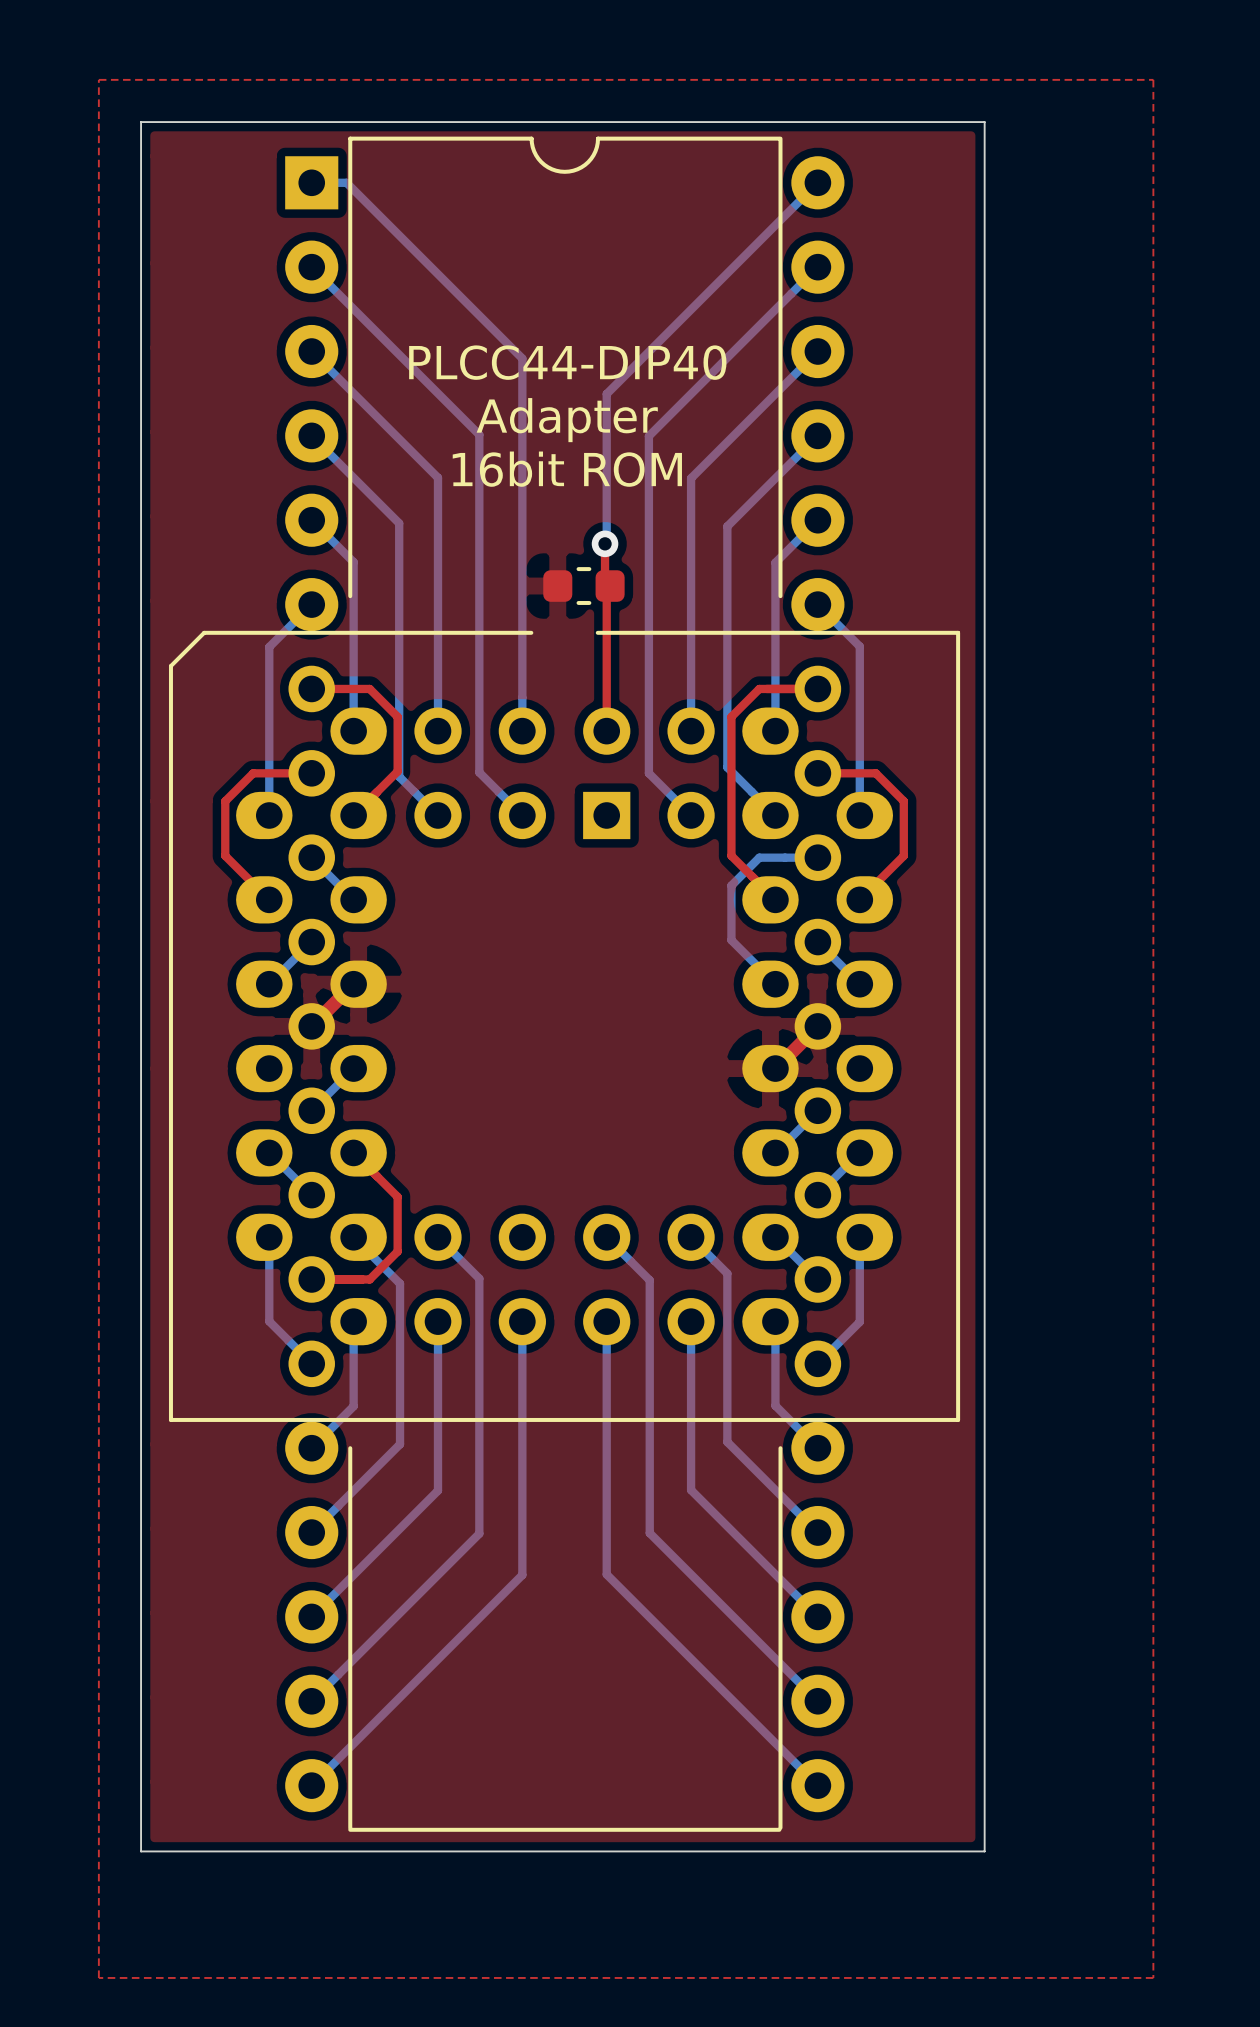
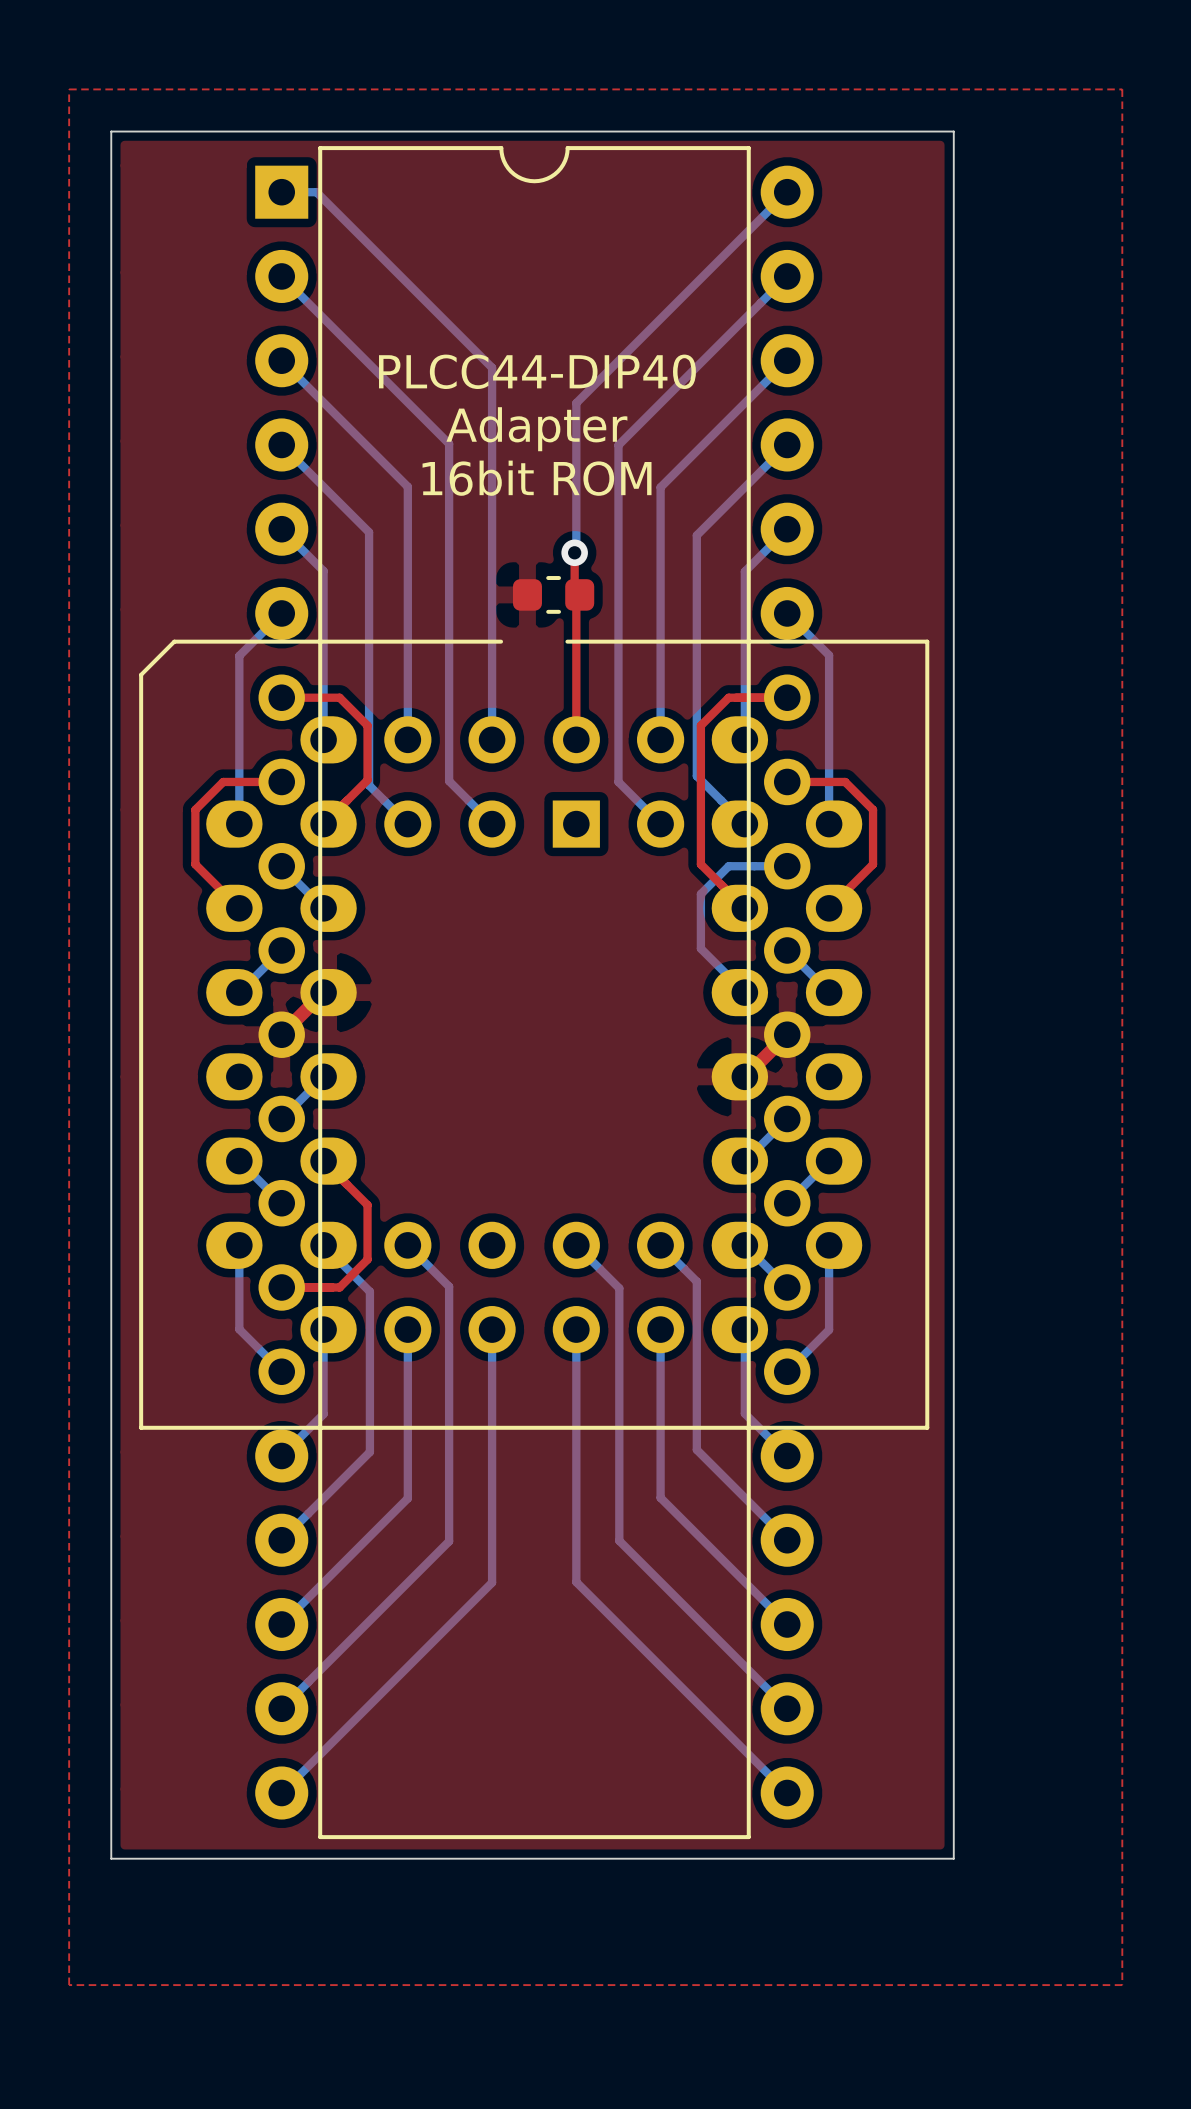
part footprint: [285, 136, 845, 1832] -> [255, 146, 814, 1840]

